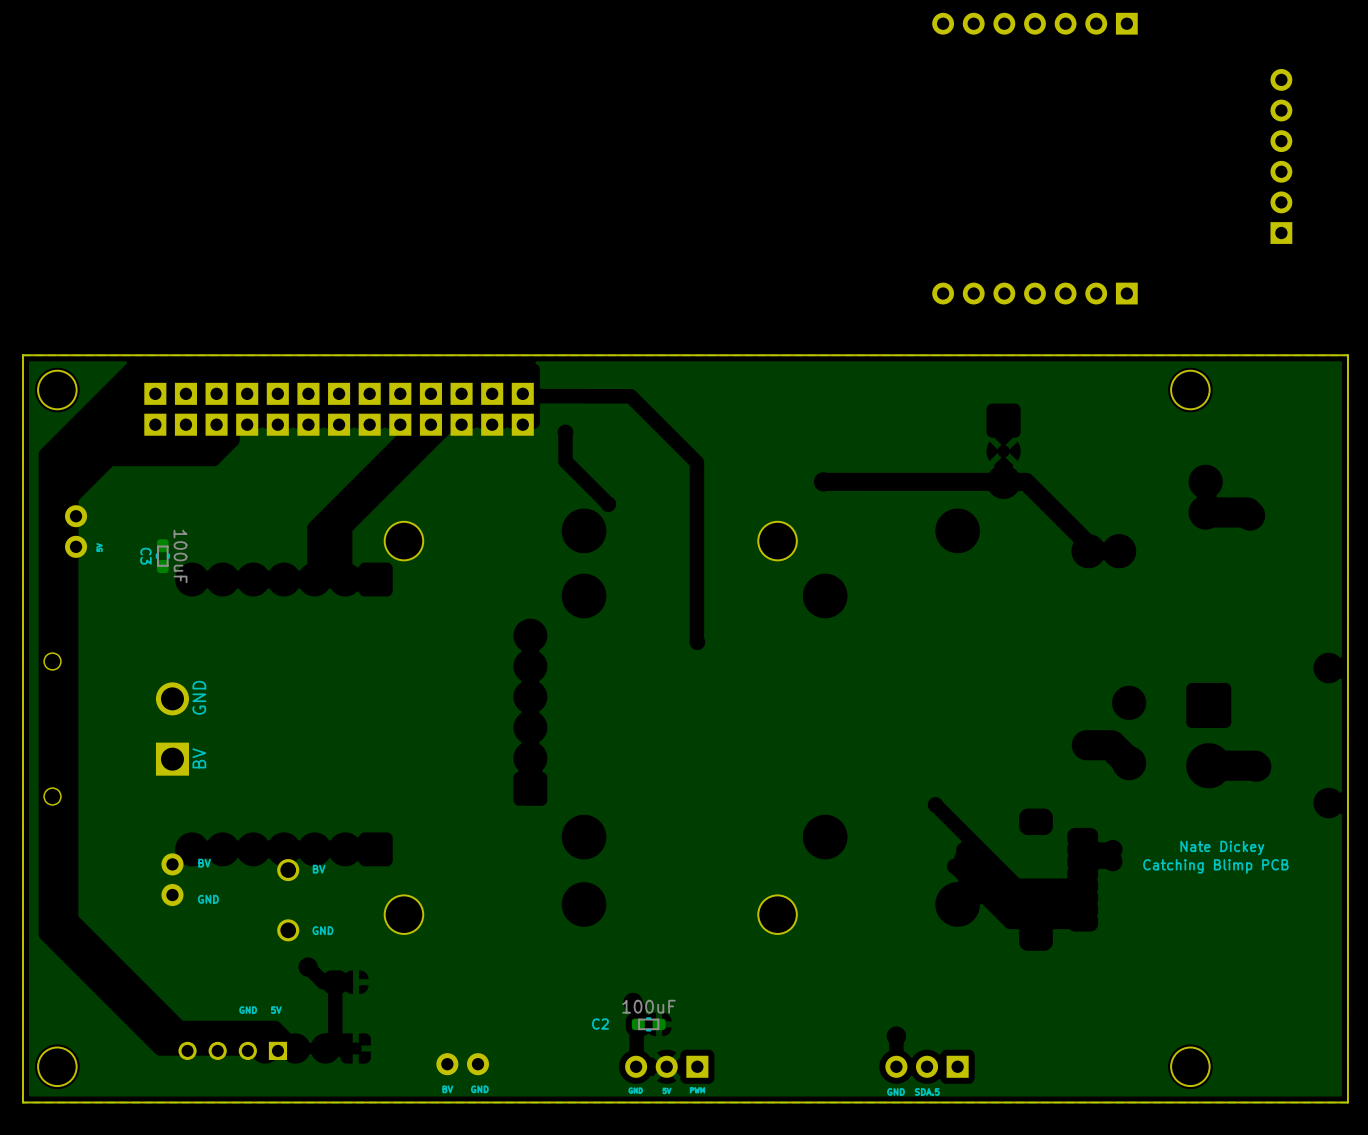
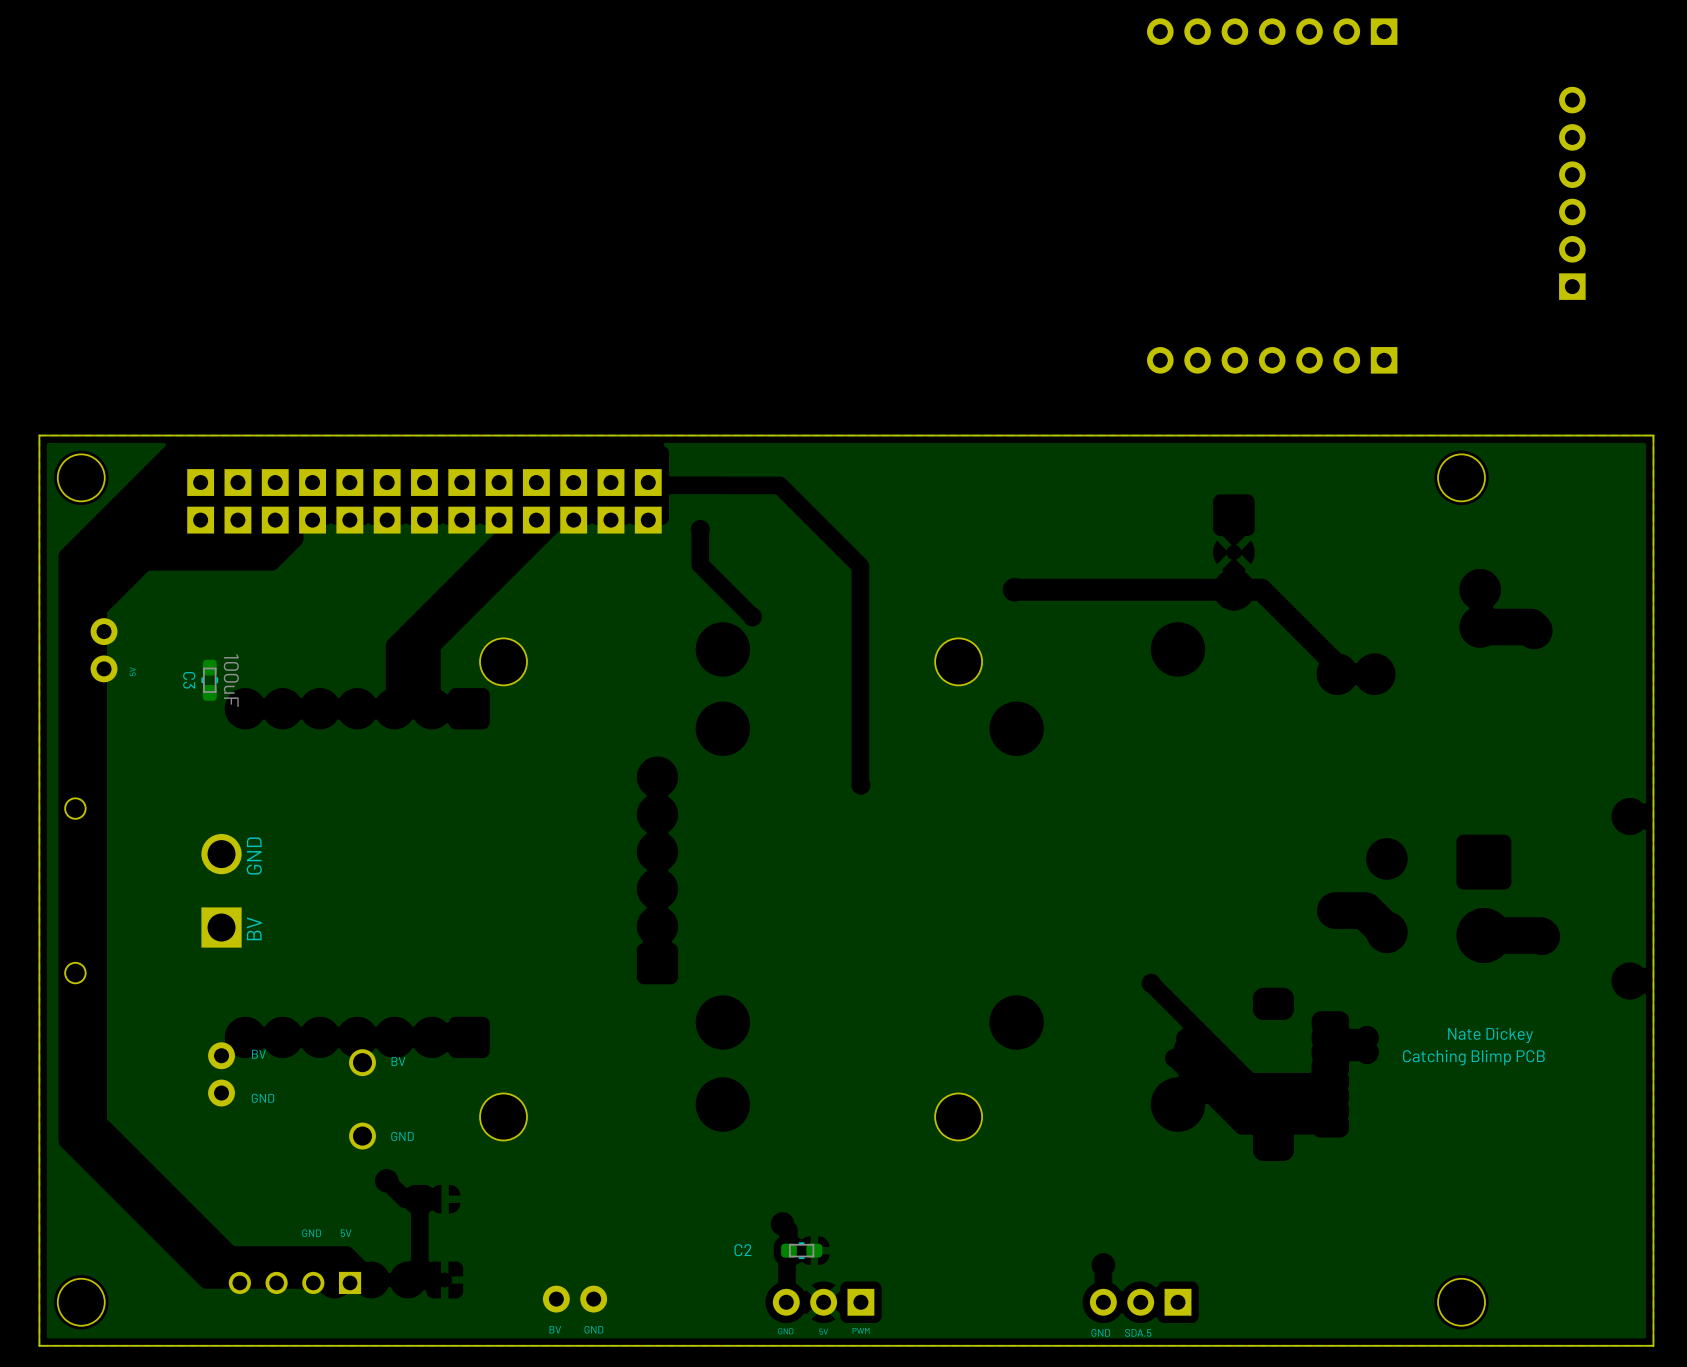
part value: 100uF (648, 1006) -> none

